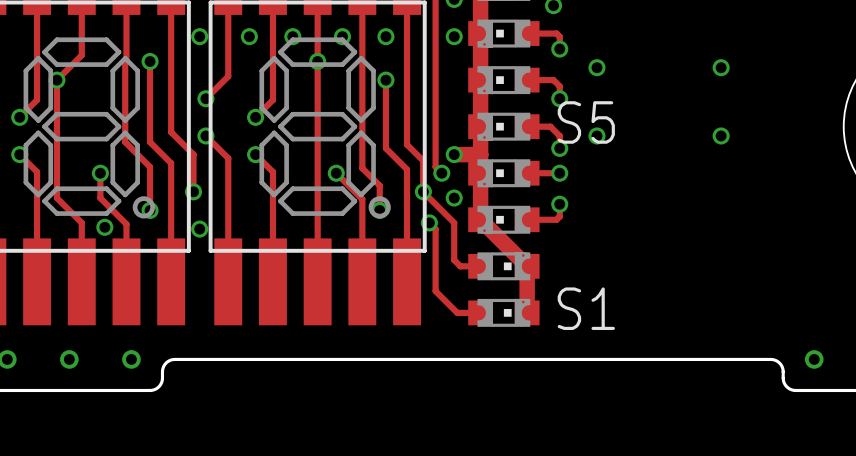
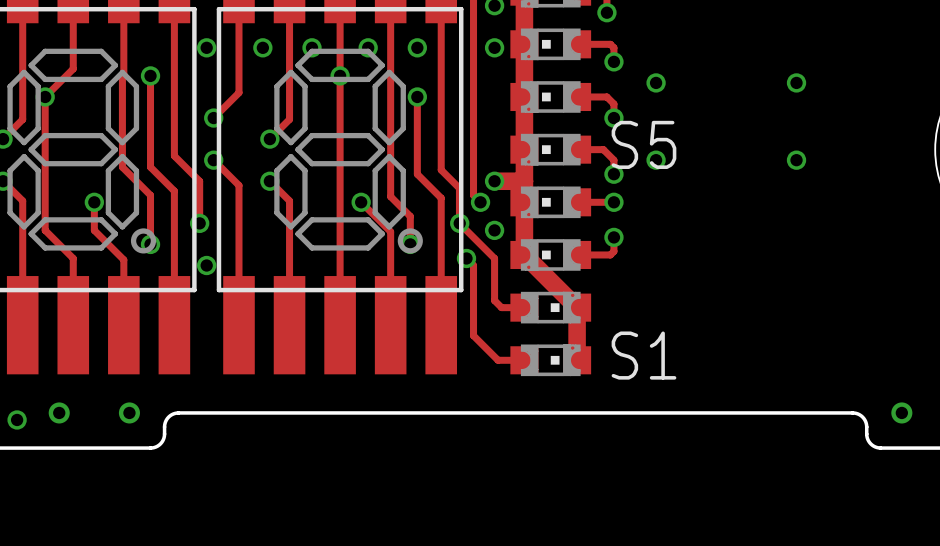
via: (104, 227) -> none
via: none -> (17, 419)

